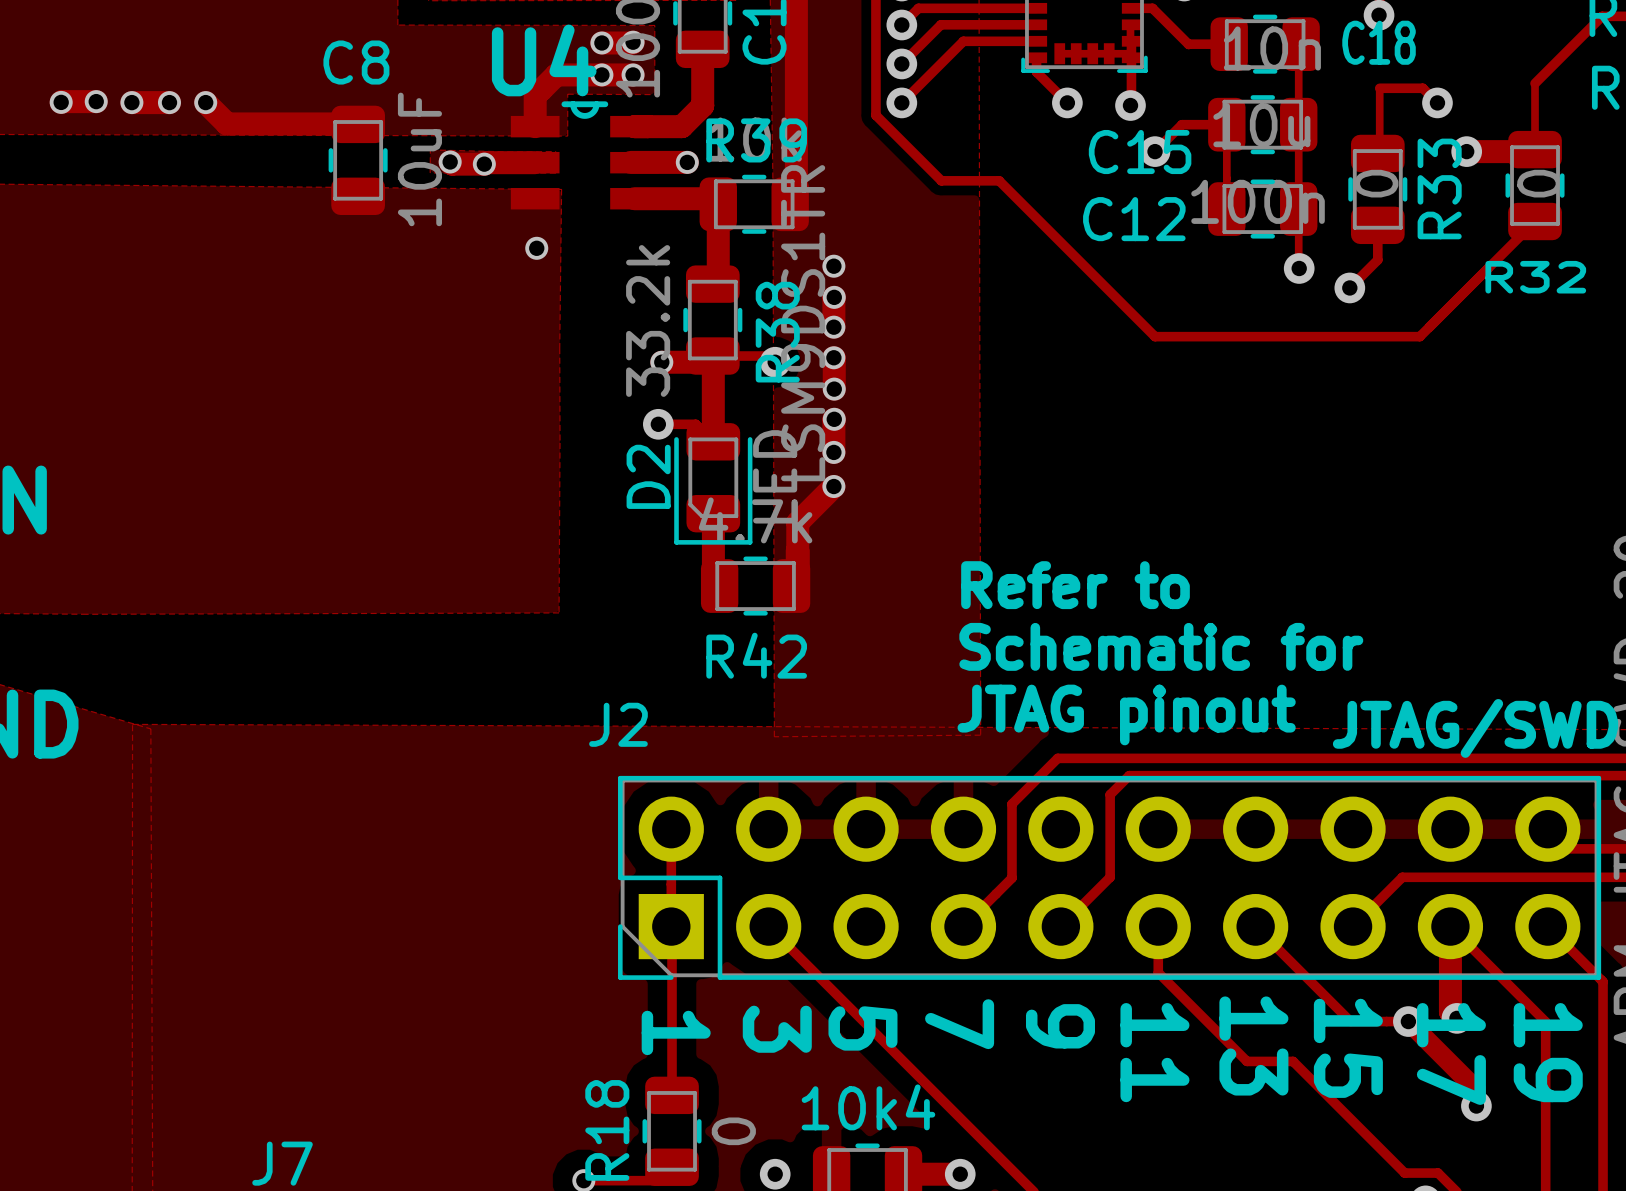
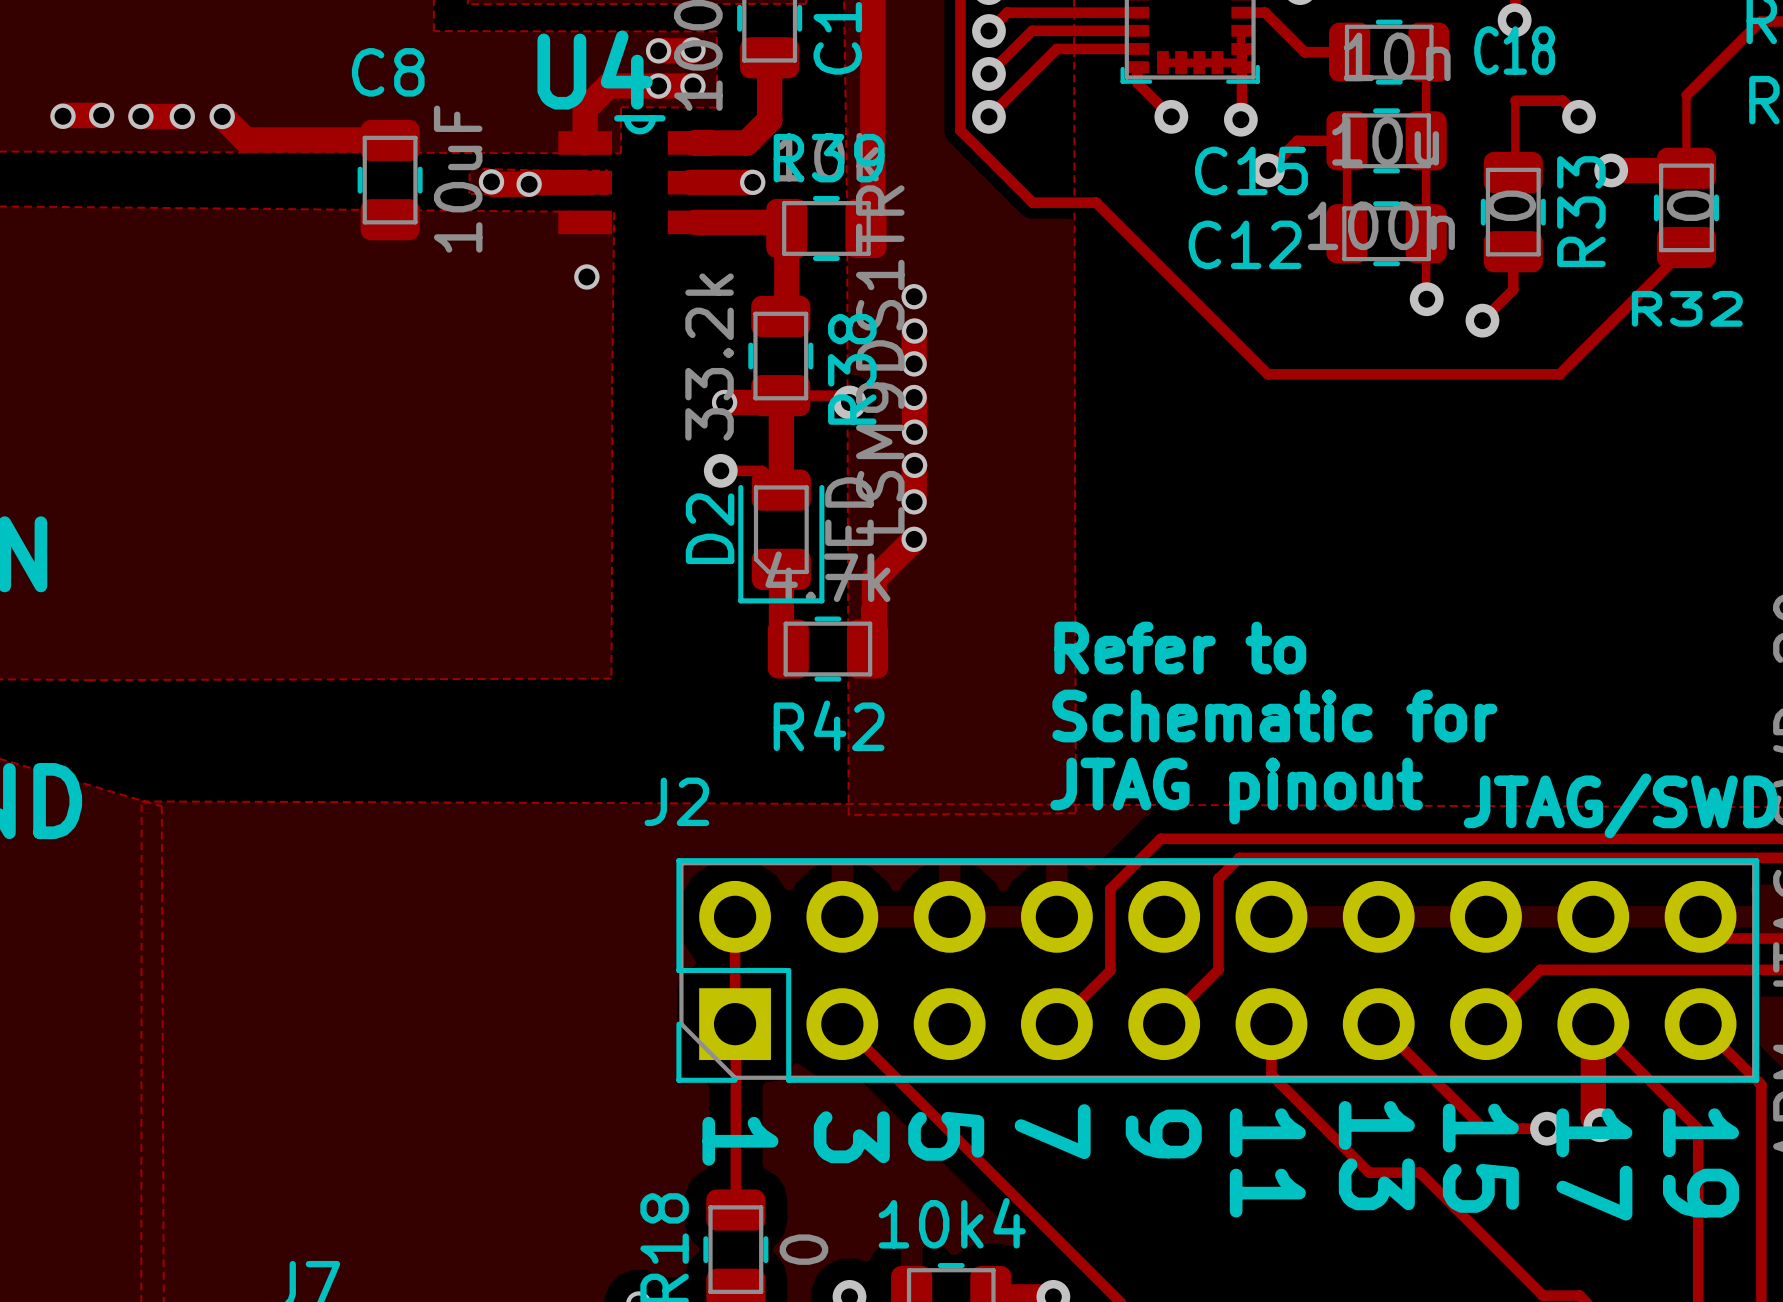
track: (1408, 1021) (1476, 1089) (1476, 1106) -> none
via: (1476, 1106) -> none

